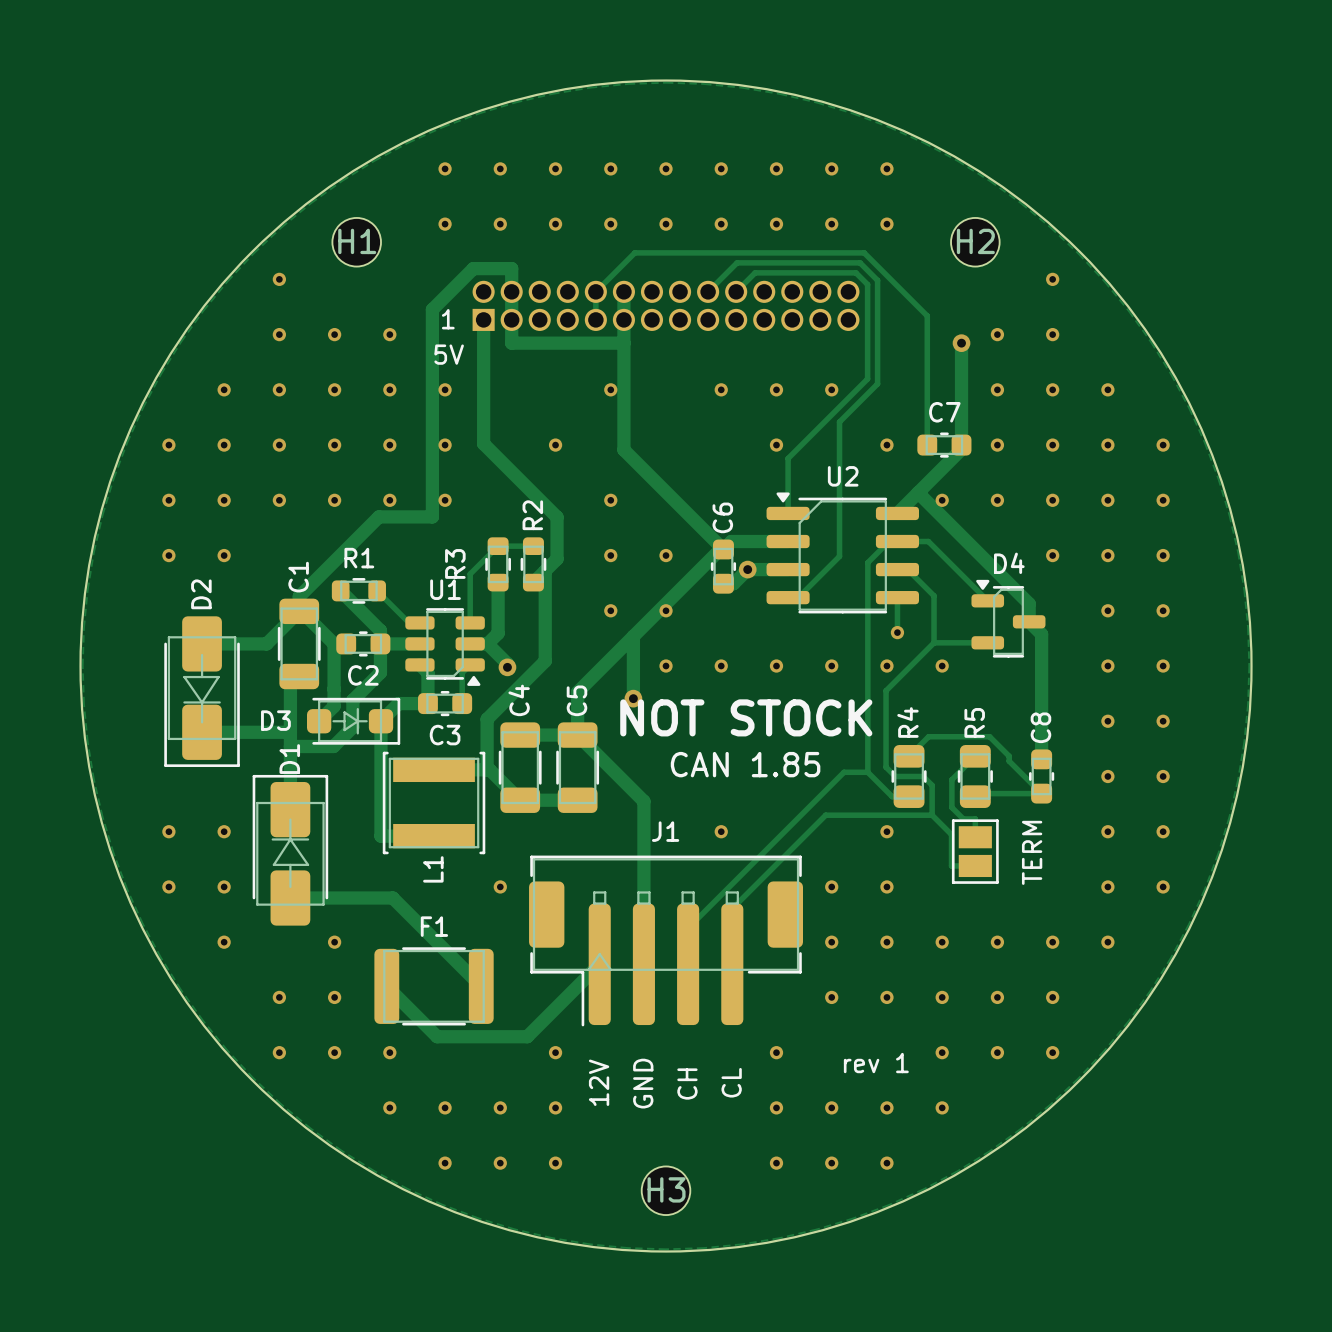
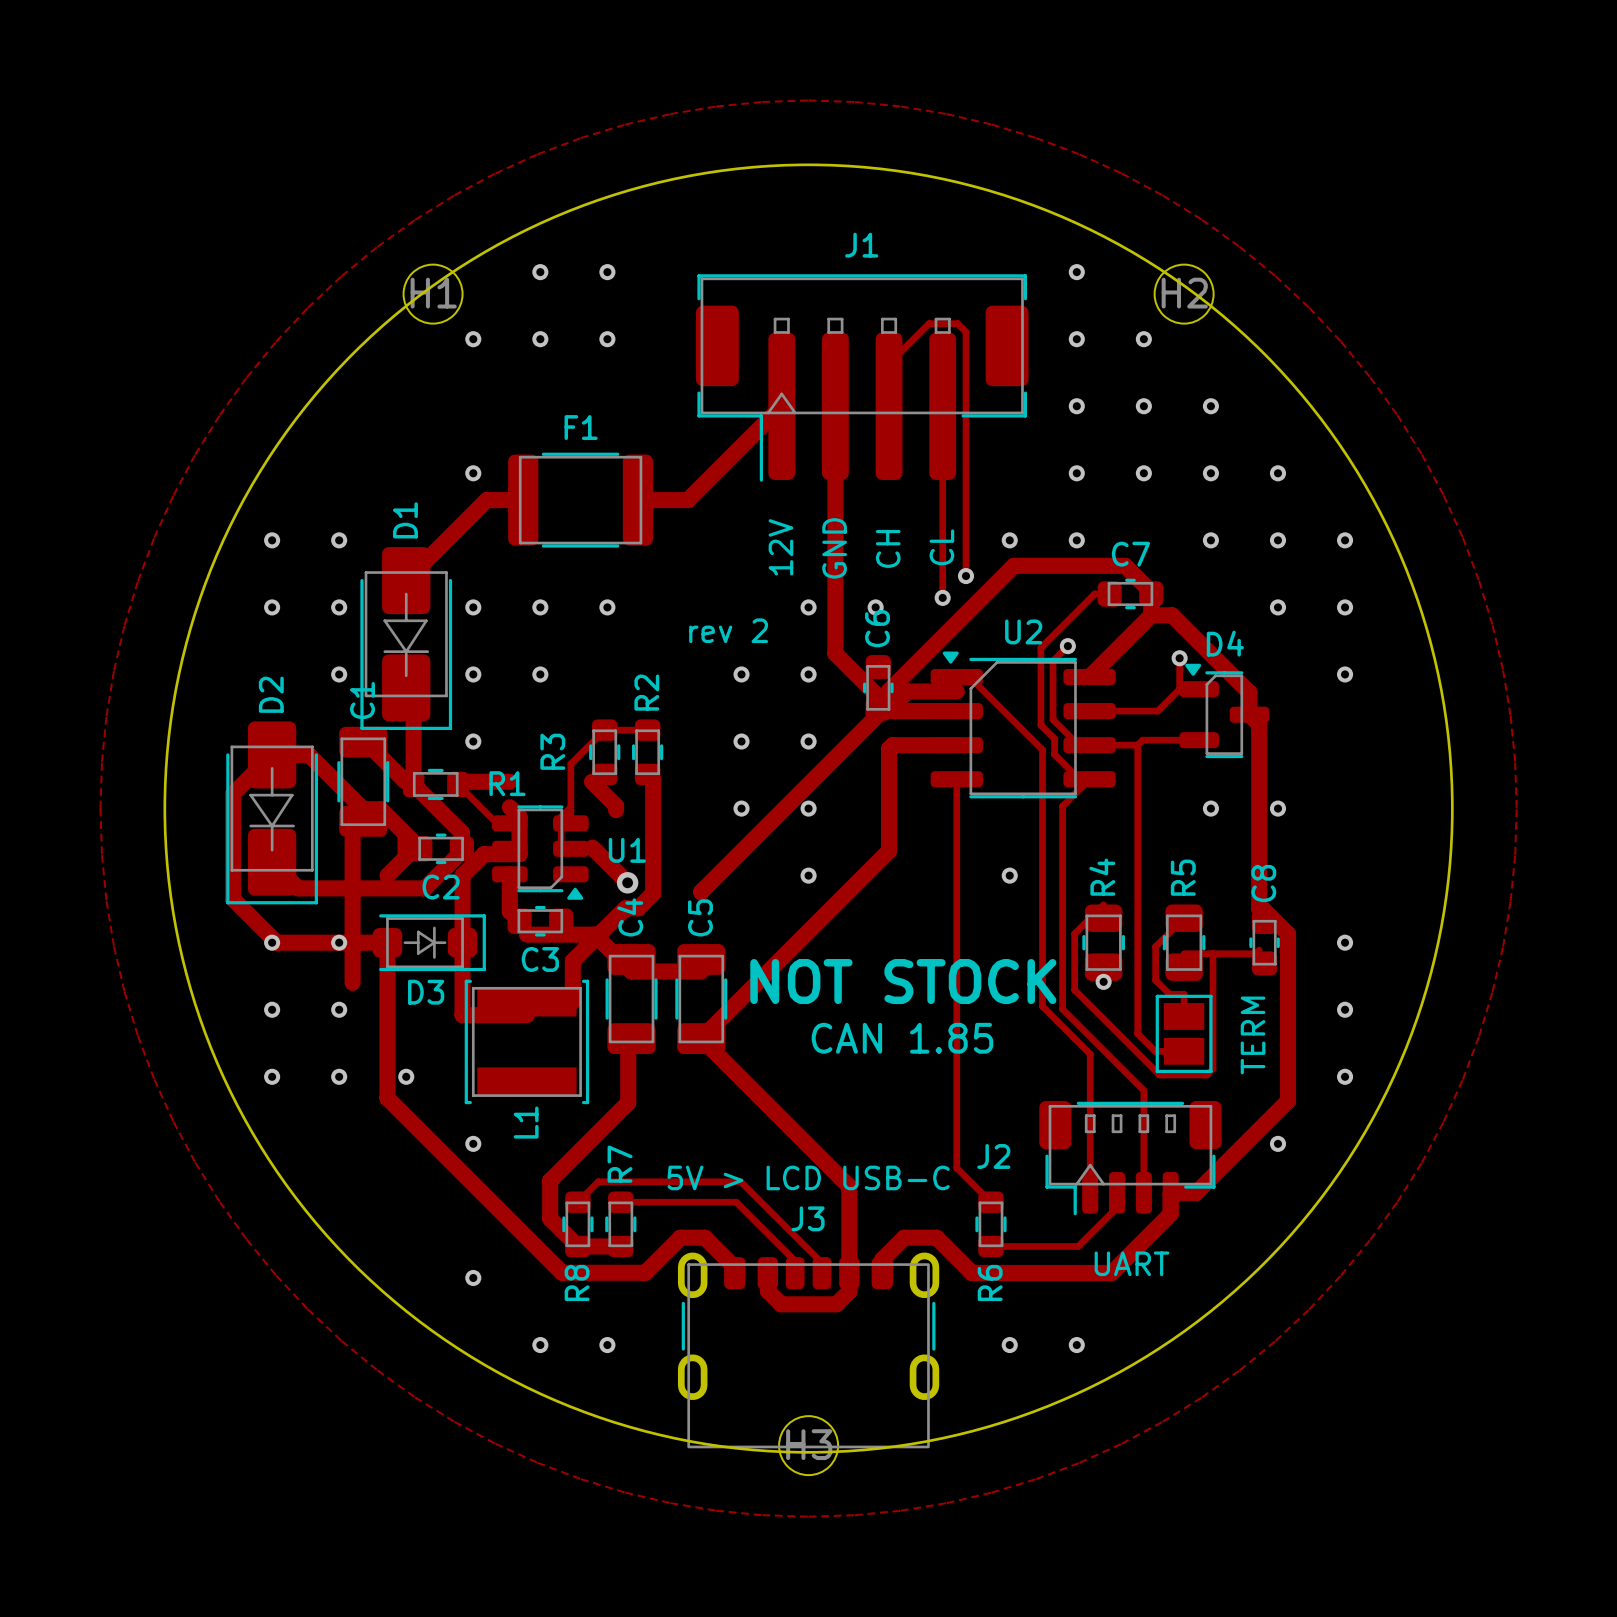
round board edge size: [79, 79, 1253, 1253] -> [163, 163, 1454, 1454]
via: (445, 168) -> none
via: (500, 168) -> none
via: (555, 168) -> none
via: (610, 168) -> none
via: (666, 168) -> none
via: (721, 168) -> none
via: (776, 168) -> none
via: (831, 168) -> none
via: (886, 168) -> none
via: (555, 224) -> none
via: (610, 224) -> none
via: (666, 224) -> none
via: (721, 224) -> none
via: (776, 224) -> none
via: (831, 224) -> none
via: (279, 279) -> none
via: none -> (473, 339)
via: none -> (540, 339)
via: none -> (607, 339)
via: none -> (1076, 339)
via: none -> (1143, 339)
via: (1052, 279) -> none
track: (623, 291) (623, 449) (723, 549) (731, 541) (788, 541) -> none
track: (708, 291) (737, 262) (860, 262) (877, 280) (877, 383) (839, 422) (839, 556) (798, 597) (788, 597) -> none
track: (736, 291) (755, 272) (855, 272) (867, 284) (867, 378) (788, 458) (788, 513) -> none
part: (666, 305) -> none
text: 1 (448, 319) -> none
track: (483, 319) (483, 443) (557, 517) (557, 559) (533, 582) -> none
track: (595, 319) (595, 291) (634, 252) (864, 252) (927, 315) (927, 445) -> none
via: (279, 334) -> none
via: (334, 334) -> none
via: (389, 334) -> none
track: none -> (781, 406) (687, 500) (637, 500)
track: none -> (835, 406) (835, 653) (892, 711) (956, 711)
track: none -> (889, 406) (889, 363) (929, 323) (957, 323) (965, 331) (965, 576)
track: none -> (942, 406) (942, 597)
via: none -> (1076, 406)
via: none -> (1143, 406)
via: (1052, 334) -> none
track: (623, 343) (511, 343) (511, 268) (473, 268) (432, 309) (432, 516) (378, 516) (299, 596) (299, 611) (266, 643) (202, 643) -> none
track: (961, 343) (961, 449) (897, 513) -> none
via: (961, 343) -> none
text: 5V (449, 354) -> none
via: (224, 389) -> none
via: (279, 389) -> none
via: (334, 389) -> none
via: (445, 389) -> none
via: (610, 389) -> none
via: (721, 389) -> none
via: (776, 389) -> none
via: (831, 389) -> none
via: none -> (1076, 473)
via: none -> (1143, 473)
via: (1107, 389) -> none
track: none -> (523, 500) (486, 500) (406, 580)
via: (168, 445) -> none
via: (334, 445) -> none
via: (389, 445) -> none
via: (445, 445) -> none
via: (555, 445) -> none
via: (776, 445) -> none
via: none -> (1009, 540)
C7 position: (944, 445) -> (1130, 593)
via: (1163, 445) -> none
text: none -> 12V (780, 547)
text: none -> CL (941, 547)
text: none -> GND (834, 548)
text: none -> CH (888, 548)
via: none -> (965, 576)
track: none -> (1109, 593) (1094, 593) (1040, 647) (1040, 725) (1054, 738) (1054, 754) (1079, 779) (1089, 779)
via: none -> (942, 597)
track: (918, 492) (1029, 603) (1029, 621) (1041, 634) (1041, 759) -> none
via: (168, 500) -> none
via: (334, 500) -> none
via: none -> (607, 607)
via: (610, 500) -> none
via: none -> (808, 607)
via: none -> (875, 607)
via: (942, 500) -> none
via: (997, 500) -> none
via: (1163, 500) -> none
track: none -> (1151, 615) (1089, 677)
track: none -> (1151, 615) (1172, 615) (1249, 692) (1249, 714) (1259, 724) (1259, 908) (1262, 908) (1288, 933) (1288, 1100) (1196, 1192) (1170, 1192) (1170, 1213) (1111, 1272) (971, 1272) (936, 1237) (904, 1237) (882, 1259) (882, 1273)
track: none -> (1151, 615) (1151, 592) (1125, 565) (1013, 565) (889, 690) (889, 707)
text: none -> rev 2 (728, 630)
track: none -> (1067, 646) (1053, 660) (1053, 719) (1078, 745) (1137, 745)
via: none -> (1067, 646)
track: none -> (1179, 658) (1179, 689)
via: none -> (1179, 658)
track: (533, 546) (498, 546) (470, 574) (470, 622) -> (647, 730) (604, 730) (570, 763) (570, 823)
track: (721, 547) (577, 692) (577, 734) -> (887, 705) (701, 891)
U2 position: (842, 552) -> (1023, 724)
via: (168, 555) -> none
via: (224, 555) -> none
via: none -> (339, 674)
via: none -> (473, 674)
via: none -> (540, 674)
via: (1052, 555) -> none
via: (1163, 555) -> none
track: none -> (956, 677) (969, 677) (1042, 749) (1042, 1006) (1090, 1054) (1090, 1192)
R1 name position: R1 (359, 558) -> R1 (507, 783)
R3 position: (498, 564) -> (604, 752)
R2 position: (533, 564) -> (647, 752)
track: none -> (406, 687) (413, 695) (413, 784) (461, 832) (461, 851) (424, 888) (298, 888) (272, 862)
track: none -> (1179, 689) (1157, 711) (1089, 711)
via: (747, 569) -> none
track: (897, 569) (907, 569) (934, 595) (934, 642) -> none
track: (545, 570) (545, 661) (487, 719) (487, 769) -> none
track: (498, 582) (498, 633) (487, 643) (470, 643) -> none
U1 name position: U1 (445, 589) -> U1 (627, 850)
track: (340, 590) (380, 630) (380, 672) (352, 700) (352, 727) (333, 746) (290, 746) -> none
R1 position: (358, 590) -> (435, 784)
track: (377, 590) (409, 622) (419, 622) -> (457, 784) (496, 823) (509, 823)
track: (897, 597) (897, 632) -> none
track: (987, 600) (928, 541) (888, 541) (867, 562) (867, 772) -> none
track: none -> (1199, 740) (1142, 740) (1137, 745)
via: none -> (473, 741)
via: (1107, 610) -> none
via: (1163, 610) -> none
track: none -> (956, 745) (892, 745) (889, 748) (889, 850) (701, 1038) (849, 1186) (849, 1291) (836, 1304) (781, 1304) (767, 1290) (767, 1273)
D4 position: (1008, 618) -> (1224, 710)
via: (897, 632) -> none
track: (633, 636) (633, 698) -> none
track: none -> (647, 774) (653, 779) (653, 893) (638, 908) (625, 908) (572, 960) (572, 1001)
track: none -> (956, 779) (956, 1168) (990, 1202)
track: none -> (1089, 779) (1062, 806) (1062, 1009) (1143, 1090) (1143, 1192)
track: (934, 642) (886, 690) (886, 767) (895, 776) (923, 776) (932, 785) (932, 815) -> none
track: (934, 642) (987, 642) -> none
track: (346, 643) (334, 643) (334, 689) -> none
C2 position: (363, 643) -> (441, 848)
U1 position: (445, 647) -> (540, 852)
via: none -> (741, 808)
via: (721, 666) -> none
via: (776, 666) -> none
via: (831, 666) -> none
via: (886, 666) -> none
via: (942, 666) -> none
via: none -> (1210, 808)
via: none -> (1277, 808)
via: (1107, 666) -> none
via: (1163, 666) -> none
via: (507, 667) -> none
D2 position: (202, 691) -> (272, 812)
track: none -> (592, 847) (627, 882)
via: (633, 698) -> none
track: none -> (420, 848) (380, 809) (363, 809) (309, 754) (272, 754) (233, 793) (233, 899) (276, 942) (387, 942) (387, 1098) (562, 1272) (645, 1272) (680, 1237) (704, 1237) (734, 1267) (734, 1273)
C3 position: (445, 703) -> (540, 921)
text position: NOT STOCK (746, 717) -> NOT STOCK (903, 981)
D3 name position: D3 (275, 720) -> D3 (426, 992)
track: none -> (509, 874) (509, 911) (519, 921)
D3 position: (353, 721) -> (429, 942)
via: none -> (808, 875)
via: none -> (1009, 875)
via: (1107, 721) -> none
via: (1163, 721) -> none
via: none -> (627, 882)
track: (202, 732) (290, 732) -> none
track: (520, 735) (577, 735) (643, 801) (643, 964) -> none
track: none -> (1103, 904) (1074, 933) (1074, 990) (1159, 1075) (1206, 1075) (1212, 1068) (1212, 953)
track: (909, 756) (928, 736) (989, 736) (1009, 756) (1009, 761) (1041, 793) (978, 793) (975, 796) -> none
text position: CAN 1.85 (745, 764) -> CAN 1.85 (902, 1038)
C4 position: (520, 767) -> (631, 999)
C5 position: (577, 767) -> (701, 999)
track: (867, 772) (892, 796) (909, 796) -> none
track: (867, 772) (844, 772) (688, 928) (688, 964) -> none
via: none -> (272, 942)
via: none -> (339, 942)
via: (1163, 776) -> none
track: none -> (1259, 950) (1255, 953) (1184, 953)
L1 position: (434, 803) -> (526, 1041)
track: (932, 815) (951, 834) (951, 865) -> (1137, 745) (1137, 1033) (1155, 1051)
track: (932, 815) (825, 815) (732, 908) (732, 964) -> none
via: (168, 831) -> none
via: none -> (339, 1009)
via: (721, 831) -> none
via position: (886, 831) -> (1103, 981)
via: (1163, 831) -> none
D1 rotation: 0° (290, 850) -> 180° (406, 638)
D1 position: (290, 850) -> (406, 638)
track: none -> (628, 1038) (628, 1102) (550, 1180) (550, 1218) (577, 1246) (620, 1246)
via: (168, 886) -> none
via: none -> (339, 1076)
via: none -> (406, 1076)
via: (500, 886) -> none
via: (831, 886) -> none
via: (886, 886) -> none
via: (1163, 886) -> none
track: (290, 898) (392, 898) (481, 986) -> none
J1 position: (666, 940) -> (862, 377)
via: (224, 942) -> none
via: (334, 942) -> none
via: none -> (473, 1143)
via: (831, 942) -> none
via: (886, 942) -> none
via: (942, 942) -> none
via: (997, 942) -> none
via: (1107, 942) -> none
J2: none -> (1130, 1158)
track: (599, 964) (527, 1036) (437, 1036) (386, 986) -> none
text: none -> 5V > LCD USB-C (808, 1177)
track: none -> (1117, 1192) (1117, 1207) (1078, 1246) (990, 1246)
F1 position: (434, 986) -> (580, 500)
track: none -> (577, 1202) (598, 1181) (740, 1181) (821, 1262) (821, 1273)
track: none -> (620, 1202) (736, 1202) (795, 1261) (795, 1273)
via: (279, 997) -> none
via: (334, 997) -> none
via: (831, 997) -> none
via: (886, 997) -> none
via: (942, 997) -> none
via: (997, 997) -> none
via: (1052, 997) -> none
R8: none -> (577, 1224)
R7: none -> (620, 1224)
R6: none -> (990, 1224)
text: none -> UART (1131, 1263)
via: (279, 1052) -> none
via: (334, 1052) -> none
via: (555, 1052) -> none
via: (776, 1052) -> none
via: (942, 1052) -> none
via: (997, 1052) -> none
via: (1052, 1052) -> none
text: rev 1 (876, 1063) -> none
text: 12V (599, 1082) -> none
text: CL (731, 1082) -> none
text: GND (643, 1083) -> none
text: CH (687, 1084) -> none
via: (389, 1107) -> none
via: (555, 1107) -> none
via: (776, 1107) -> none
via: (942, 1107) -> none
J3: none -> (808, 1350)
via: (445, 1163) -> none
via: (500, 1163) -> none
via: (555, 1163) -> none
via: (776, 1163) -> none
via: (831, 1163) -> none
via: (886, 1163) -> none

